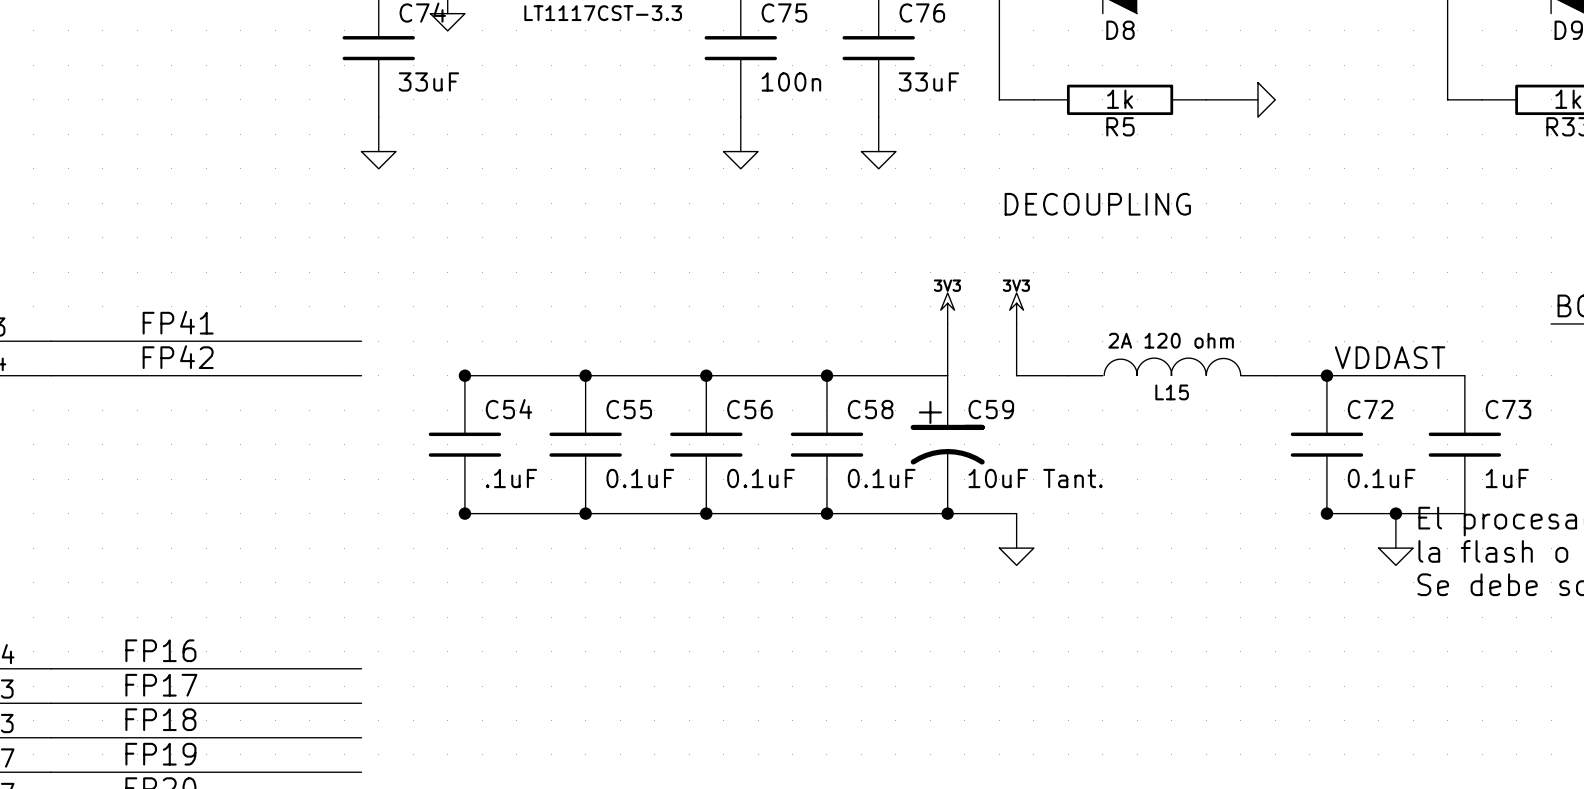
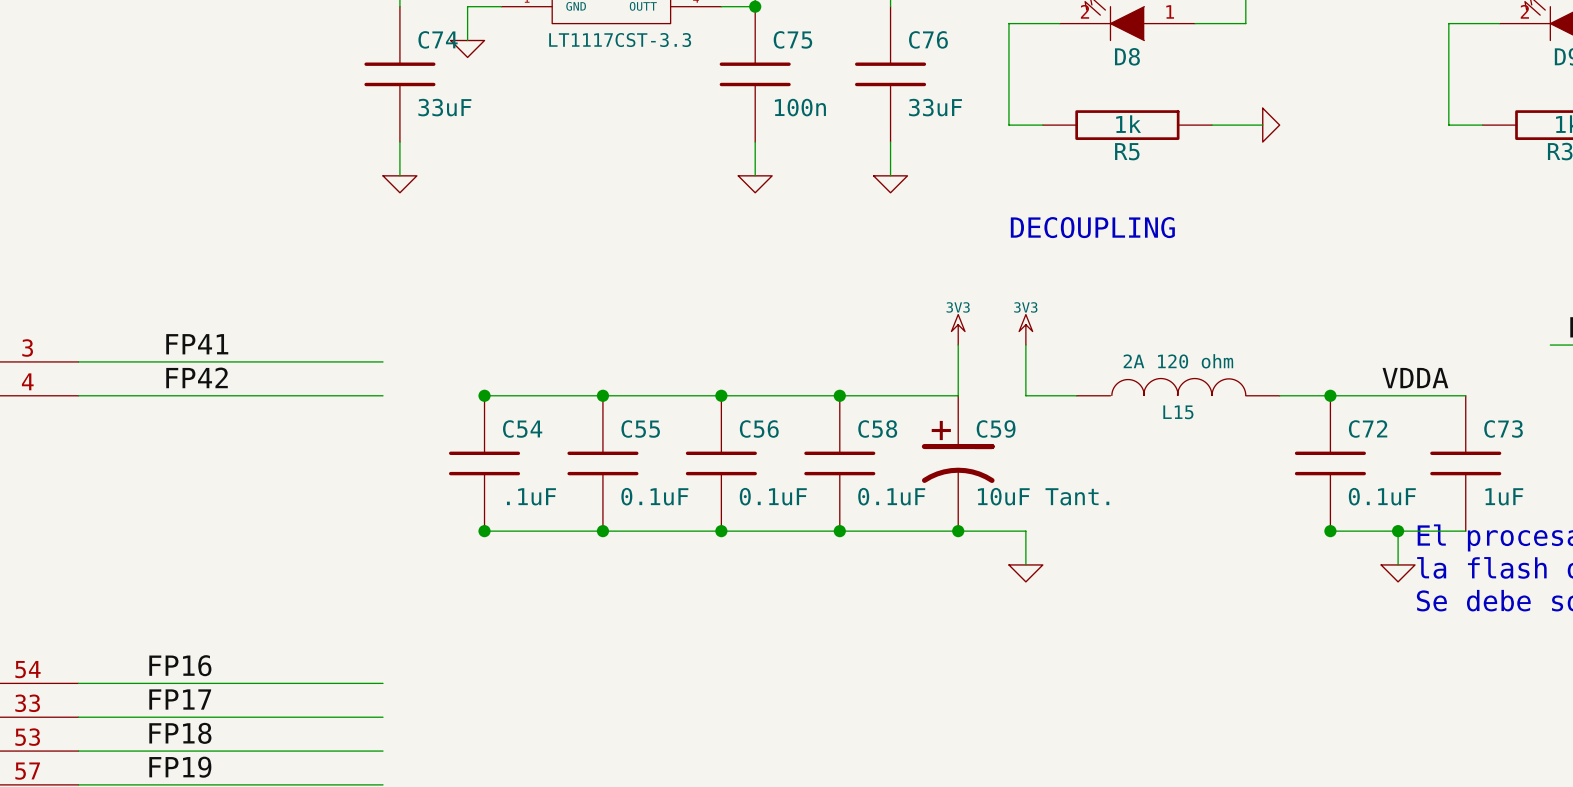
label: VDDAST (1390, 357) -> VDDA (1415, 378)

